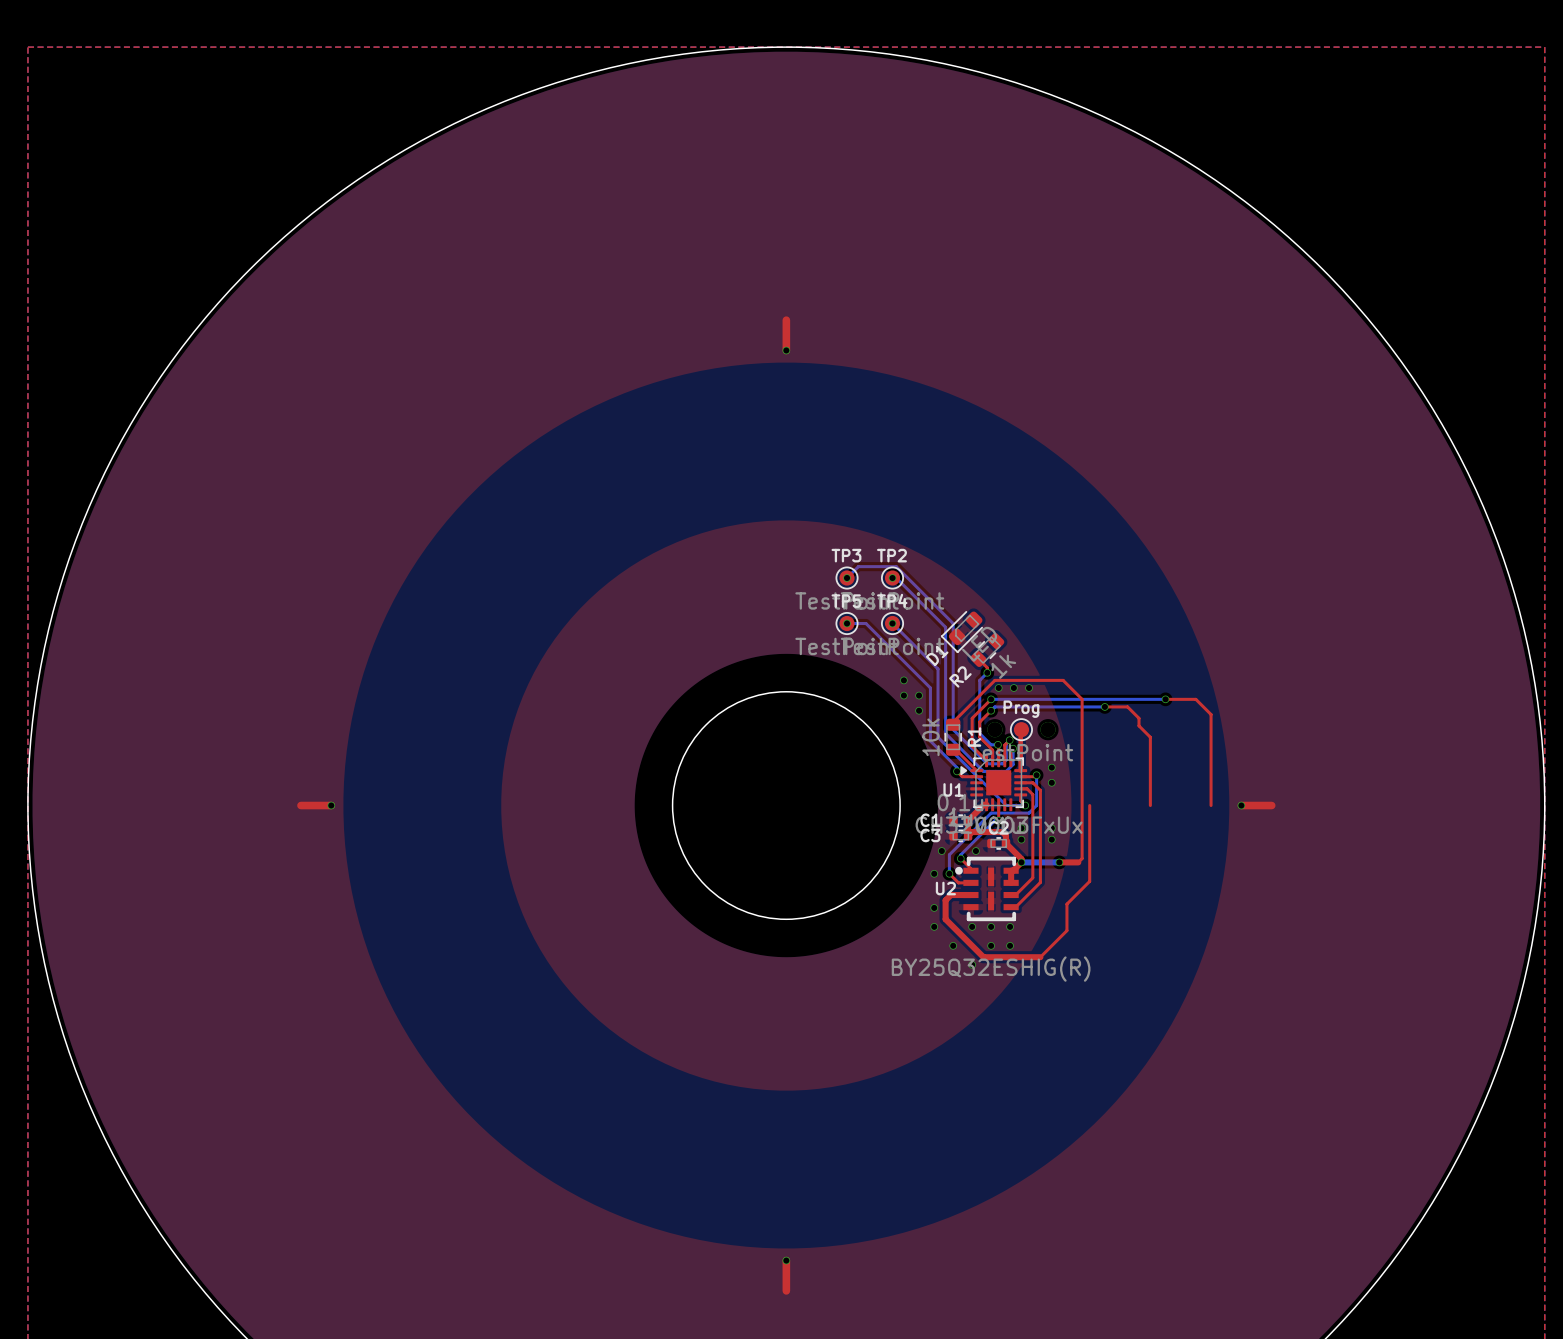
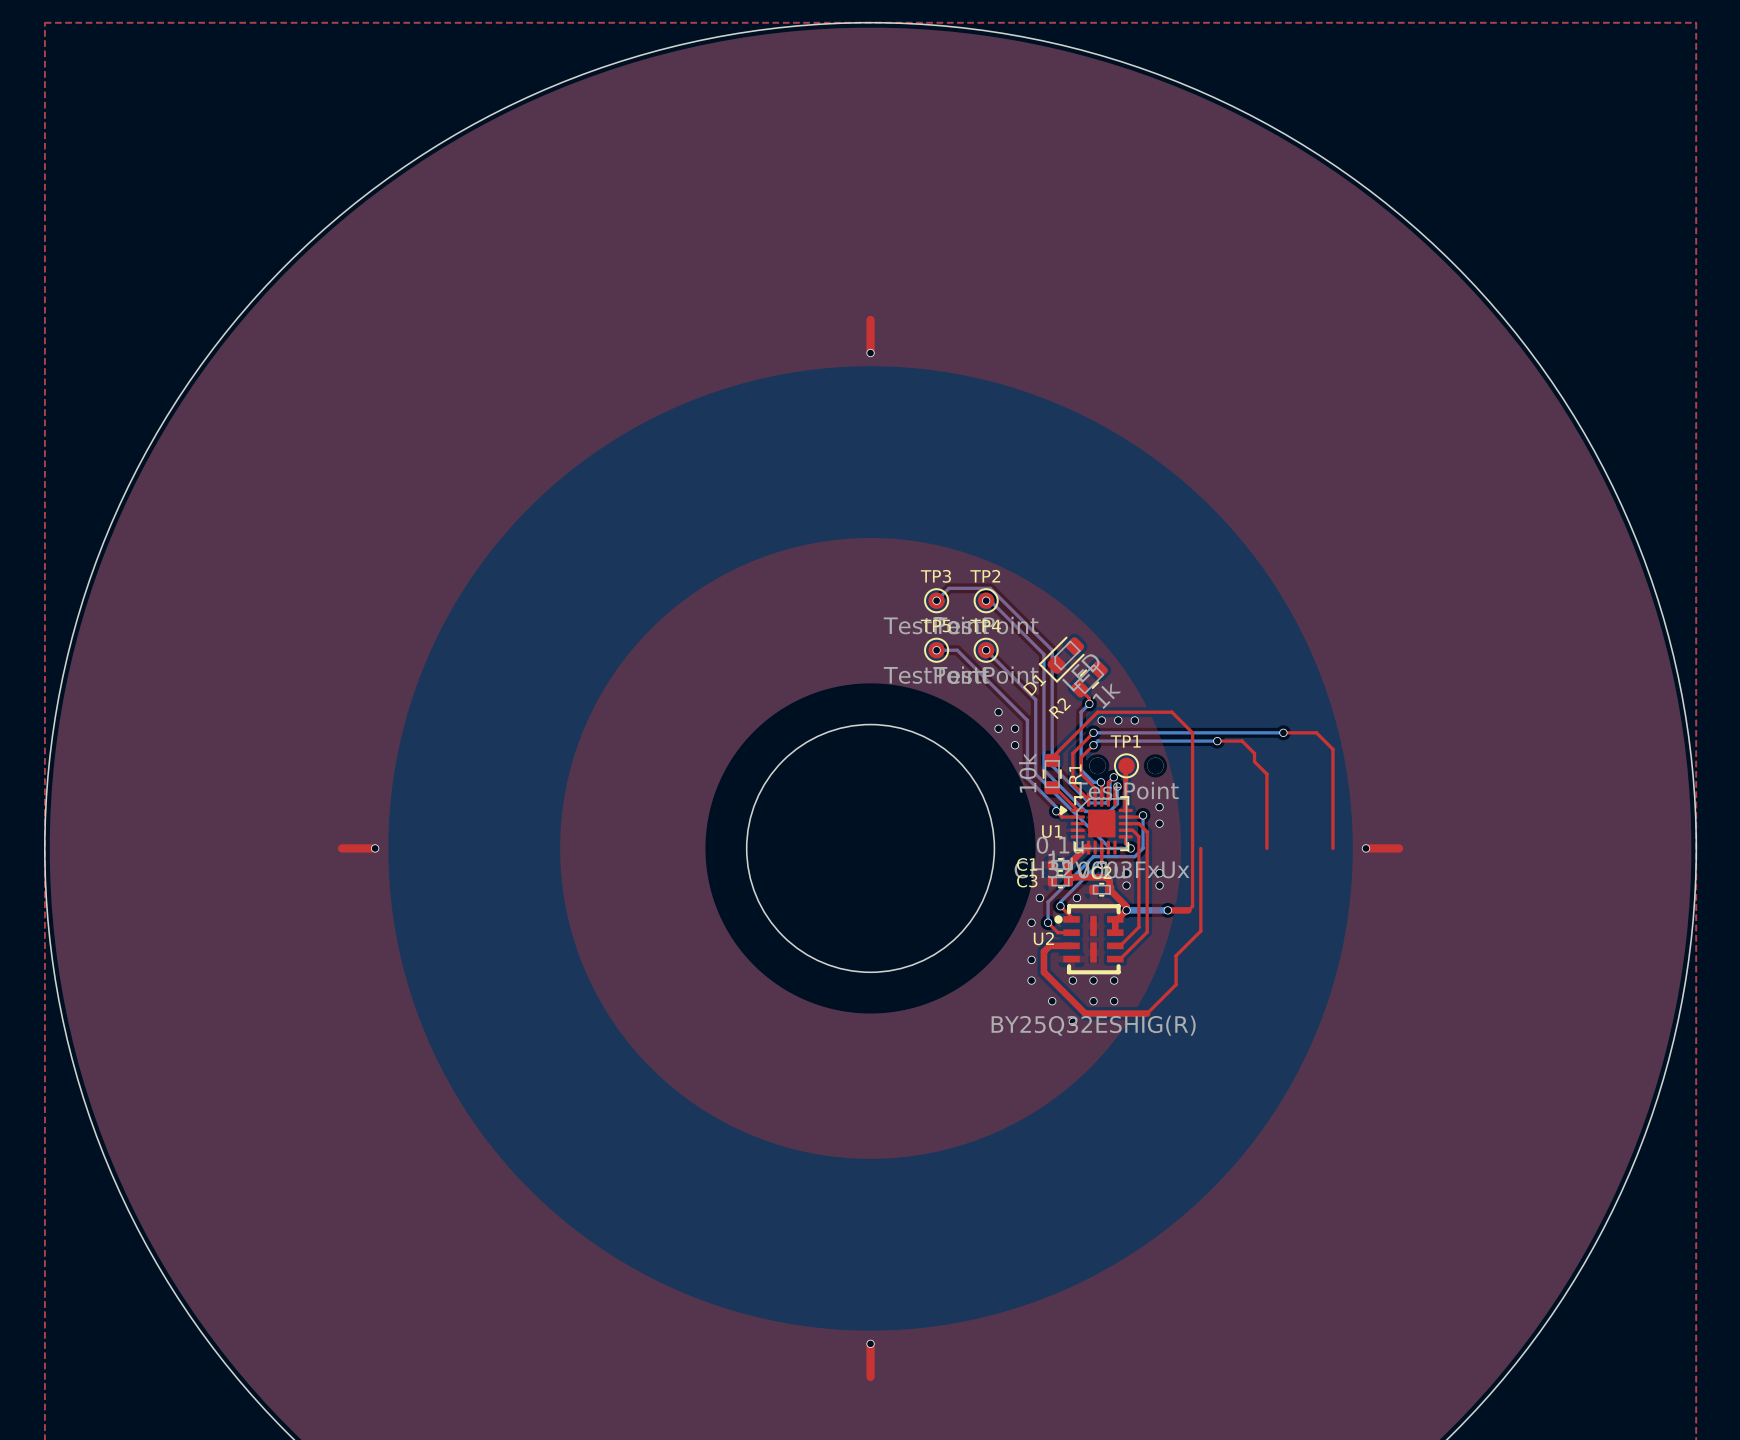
Prog name: Prog (1021, 709) -> TP1 (1125, 741)

